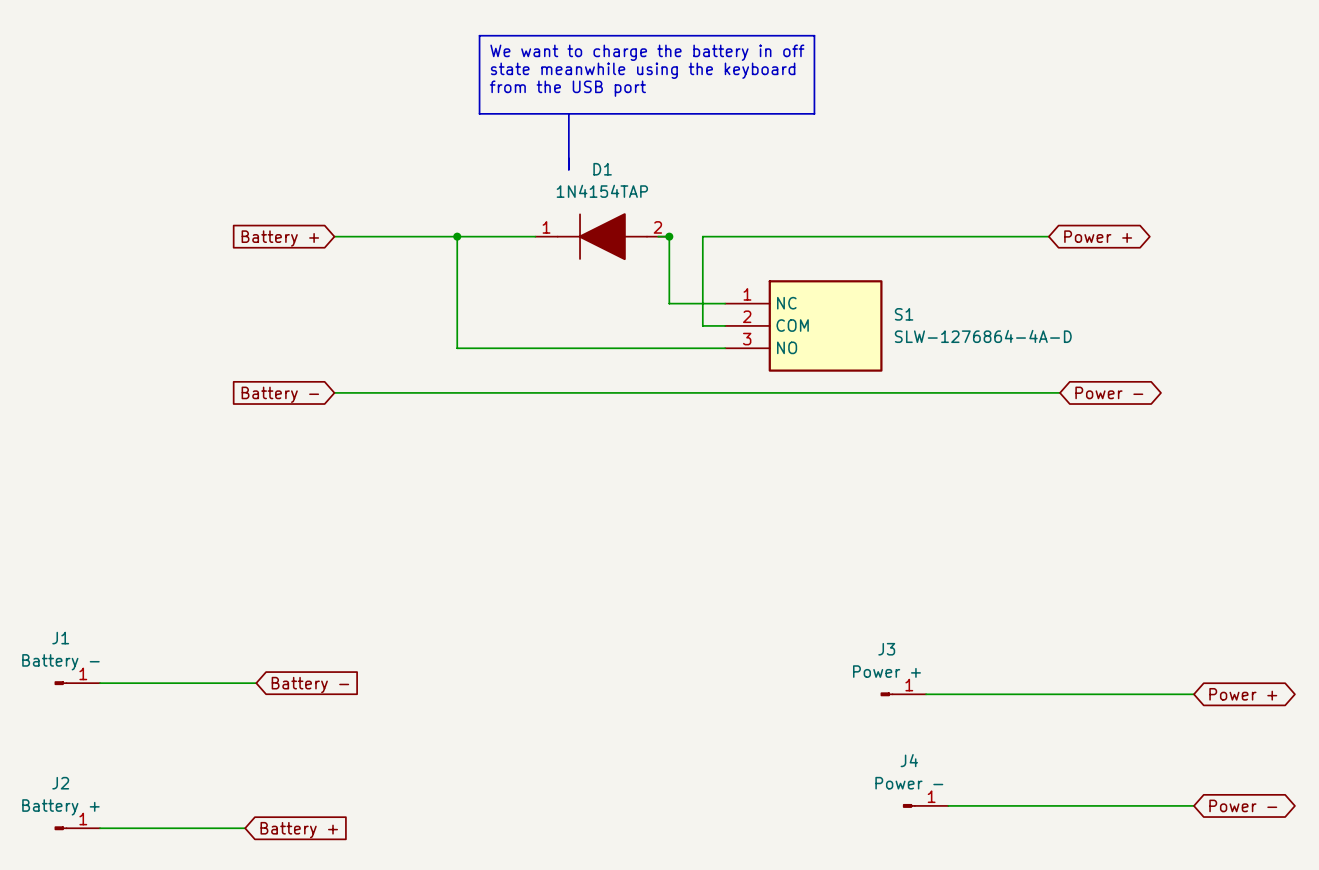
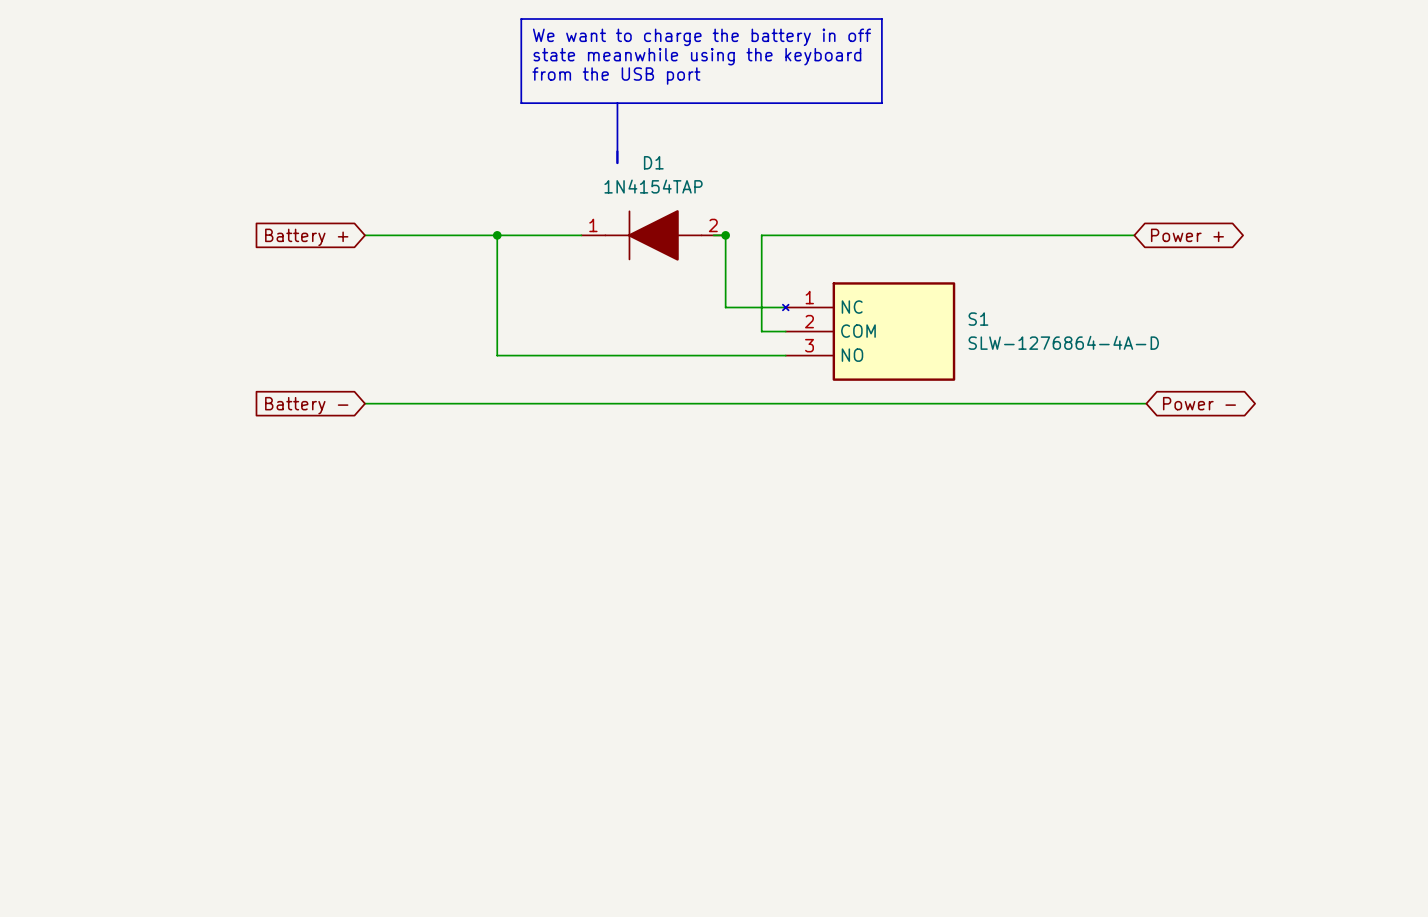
S1 symbol: [725, 280, 883, 372] -> [782, 282, 956, 381]
J1: Battery - (77, 683) -> none
wire: (100, 683) (256, 683) -> none
global label: Battery - (310, 685) -> none
J3: Power + (903, 694) -> none
wire: (926, 694) (1193, 694) -> none
global label: Power + (1243, 694) -> none
J4: Power - (925, 805) -> none
wire: (948, 805) (1193, 805) -> none
global label: Power - (1243, 805) -> none
J2: Battery + (77, 828) -> none
wire: (100, 828) (245, 828) -> none
global label: Battery + (299, 830) -> none

